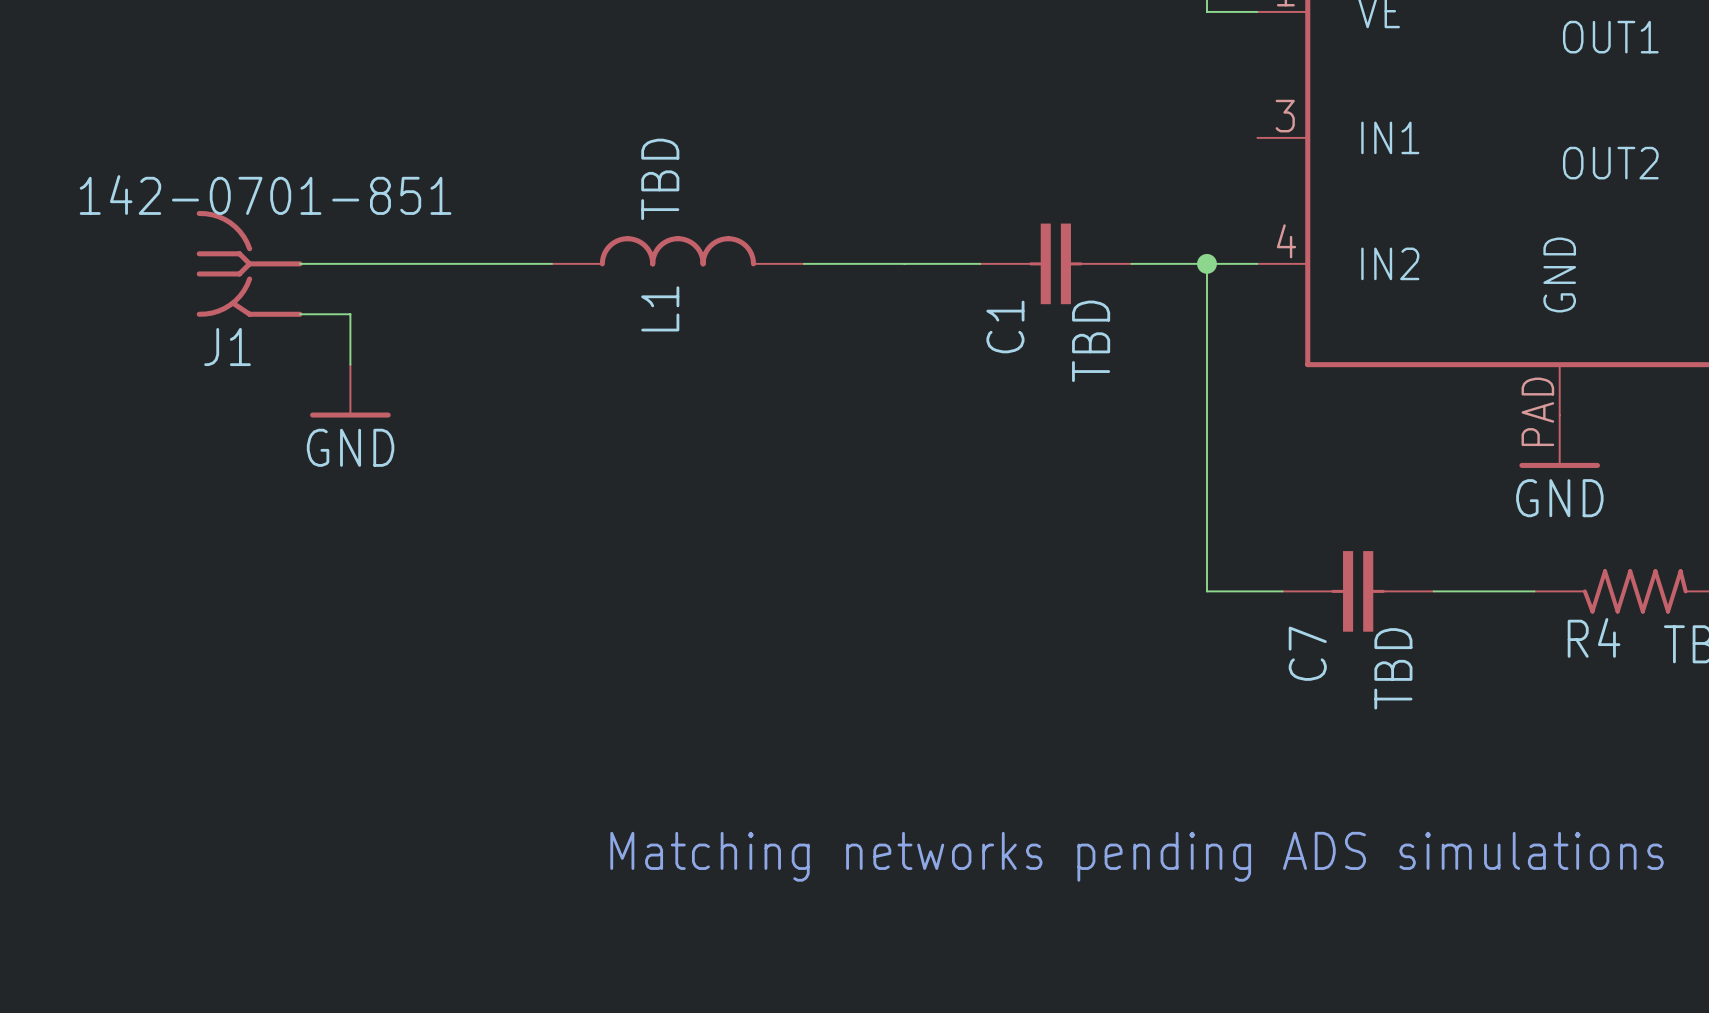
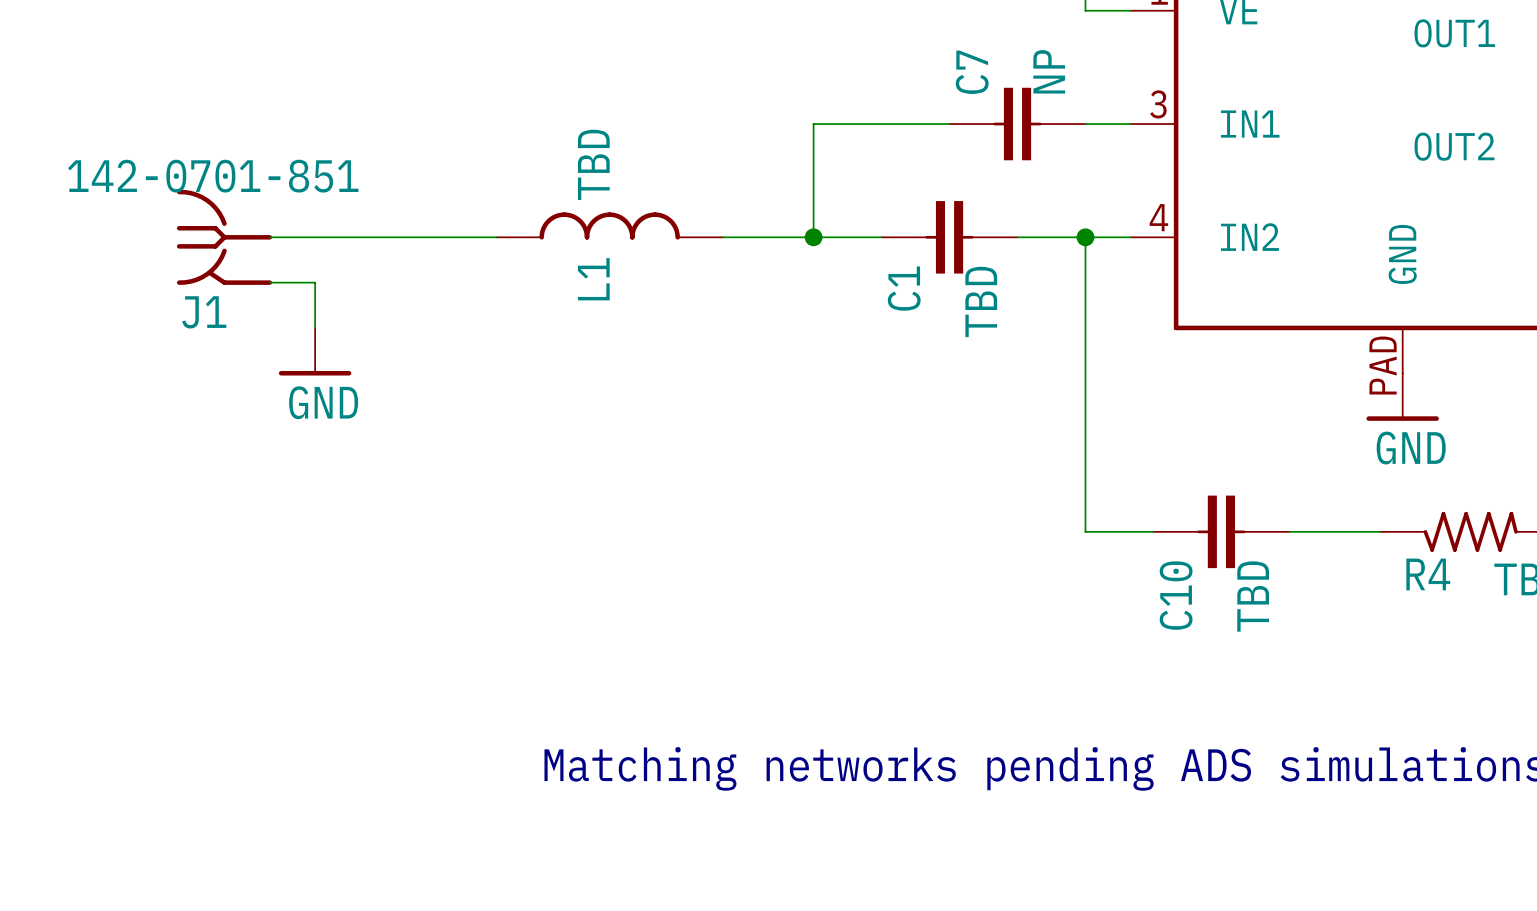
wire: none -> (949, 124) (813, 124) (813, 237)
C7: none -> NP (1017, 124)
wire: none -> (1085, 124) (1130, 124)
junction: none -> (813, 237)
C7 name: C7 (1307, 653) -> C10 (1176, 595)

